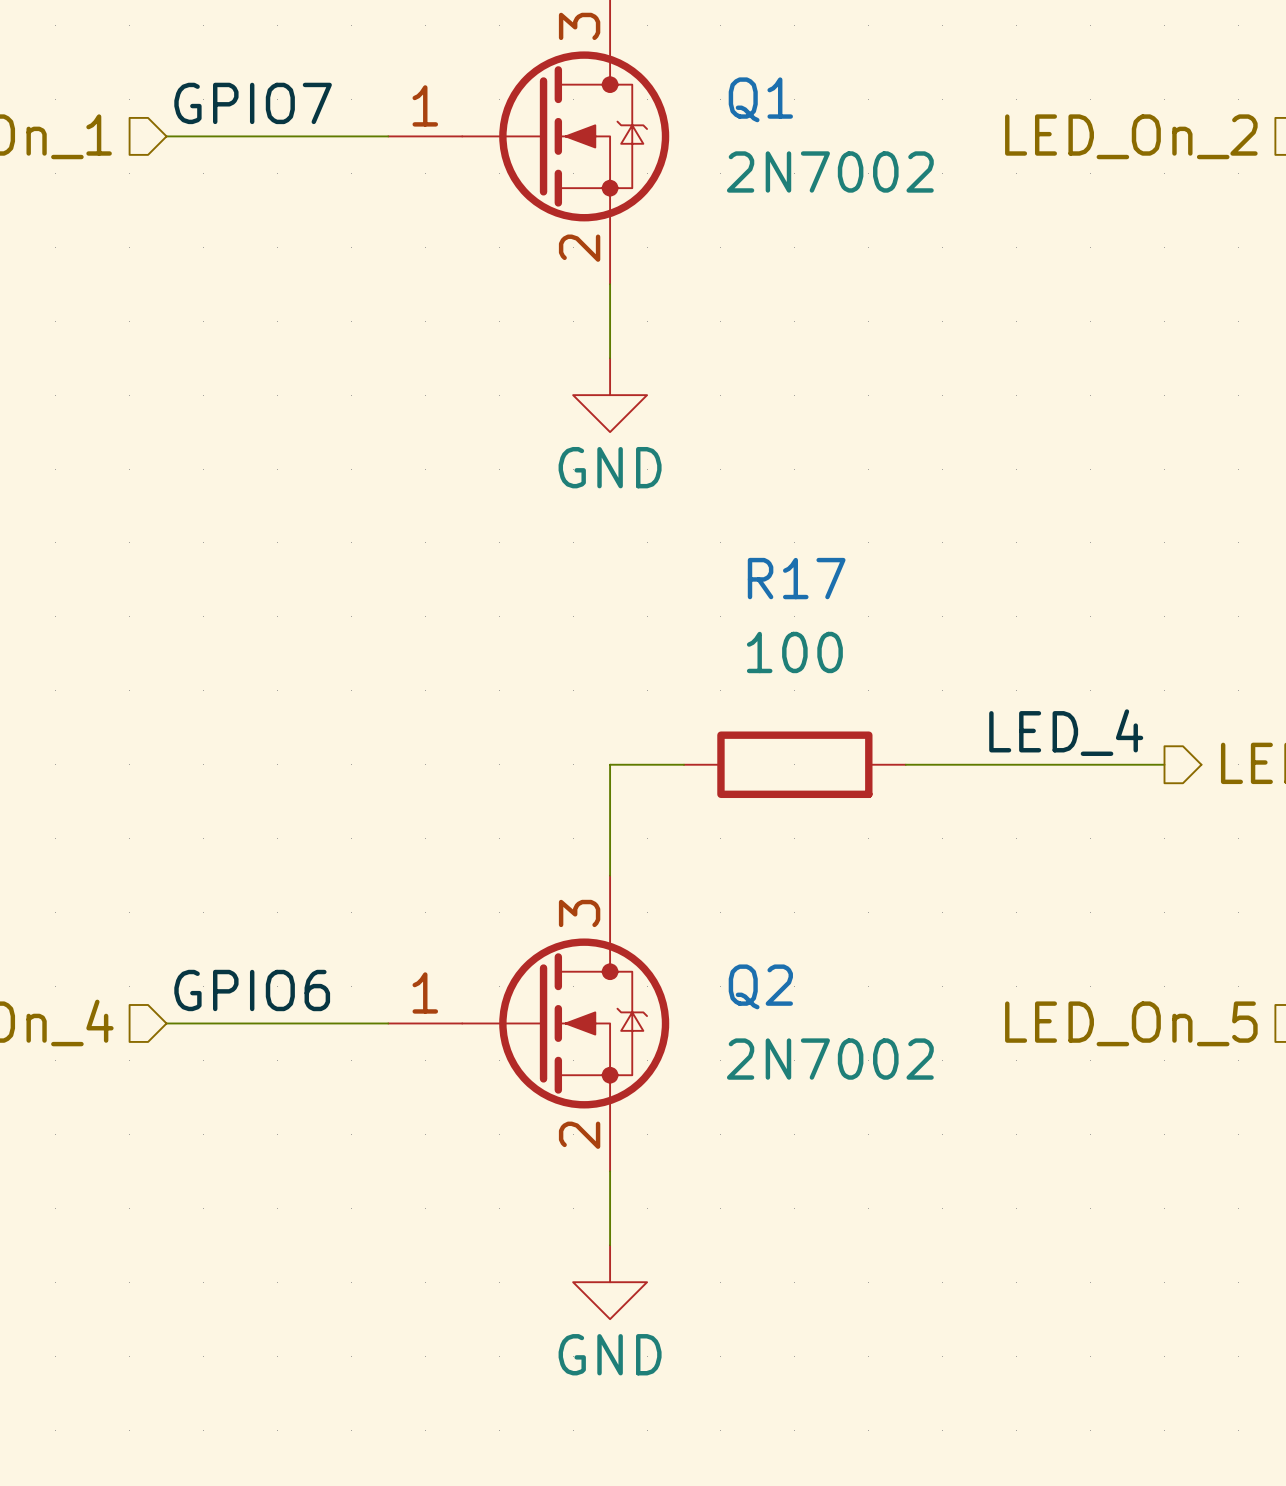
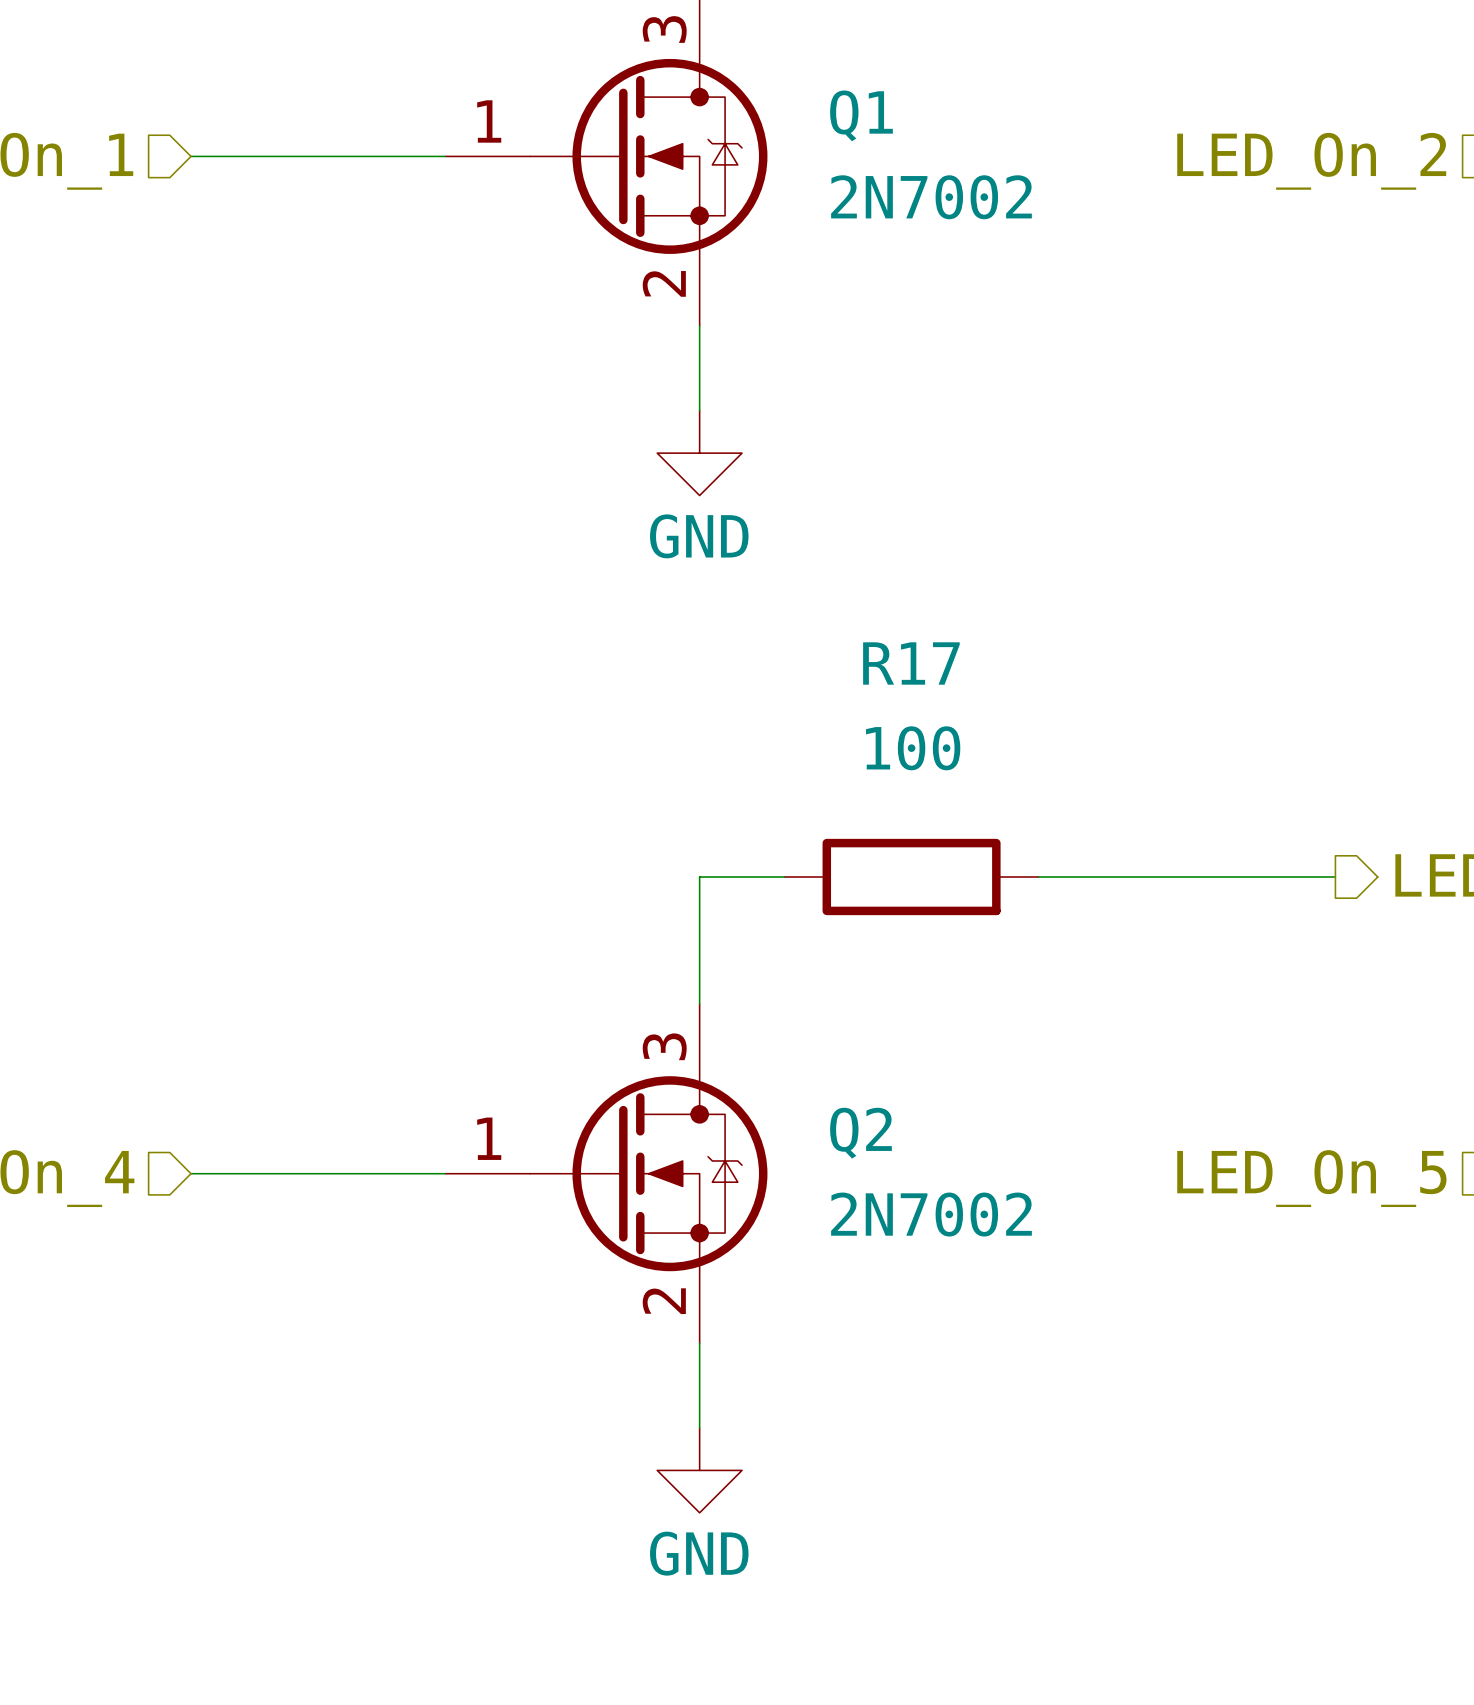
label: GPIO7 (253, 103) -> none
label: LED_4 (1066, 732) -> none
label: GPIO6 (252, 990) -> none

